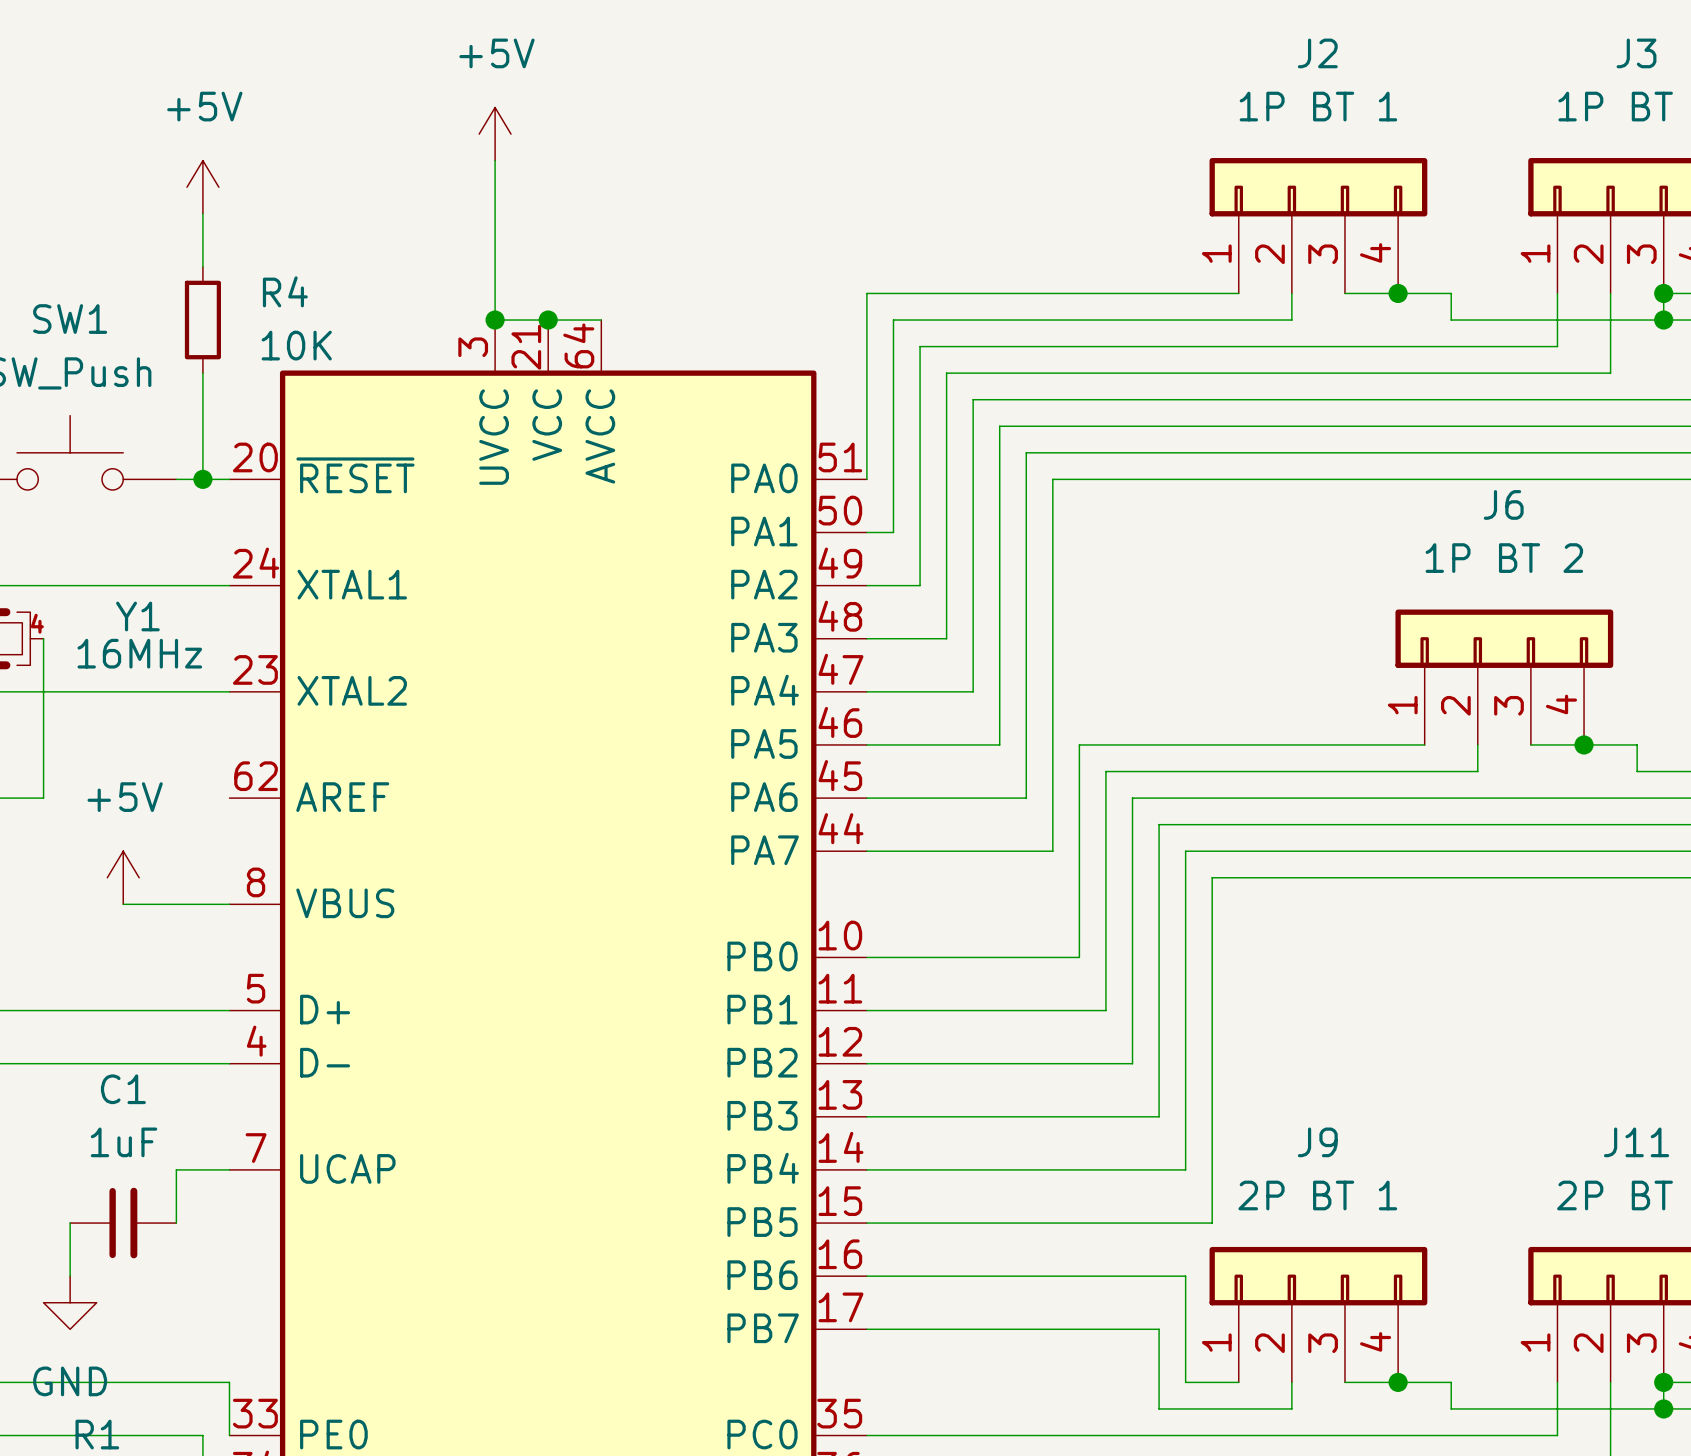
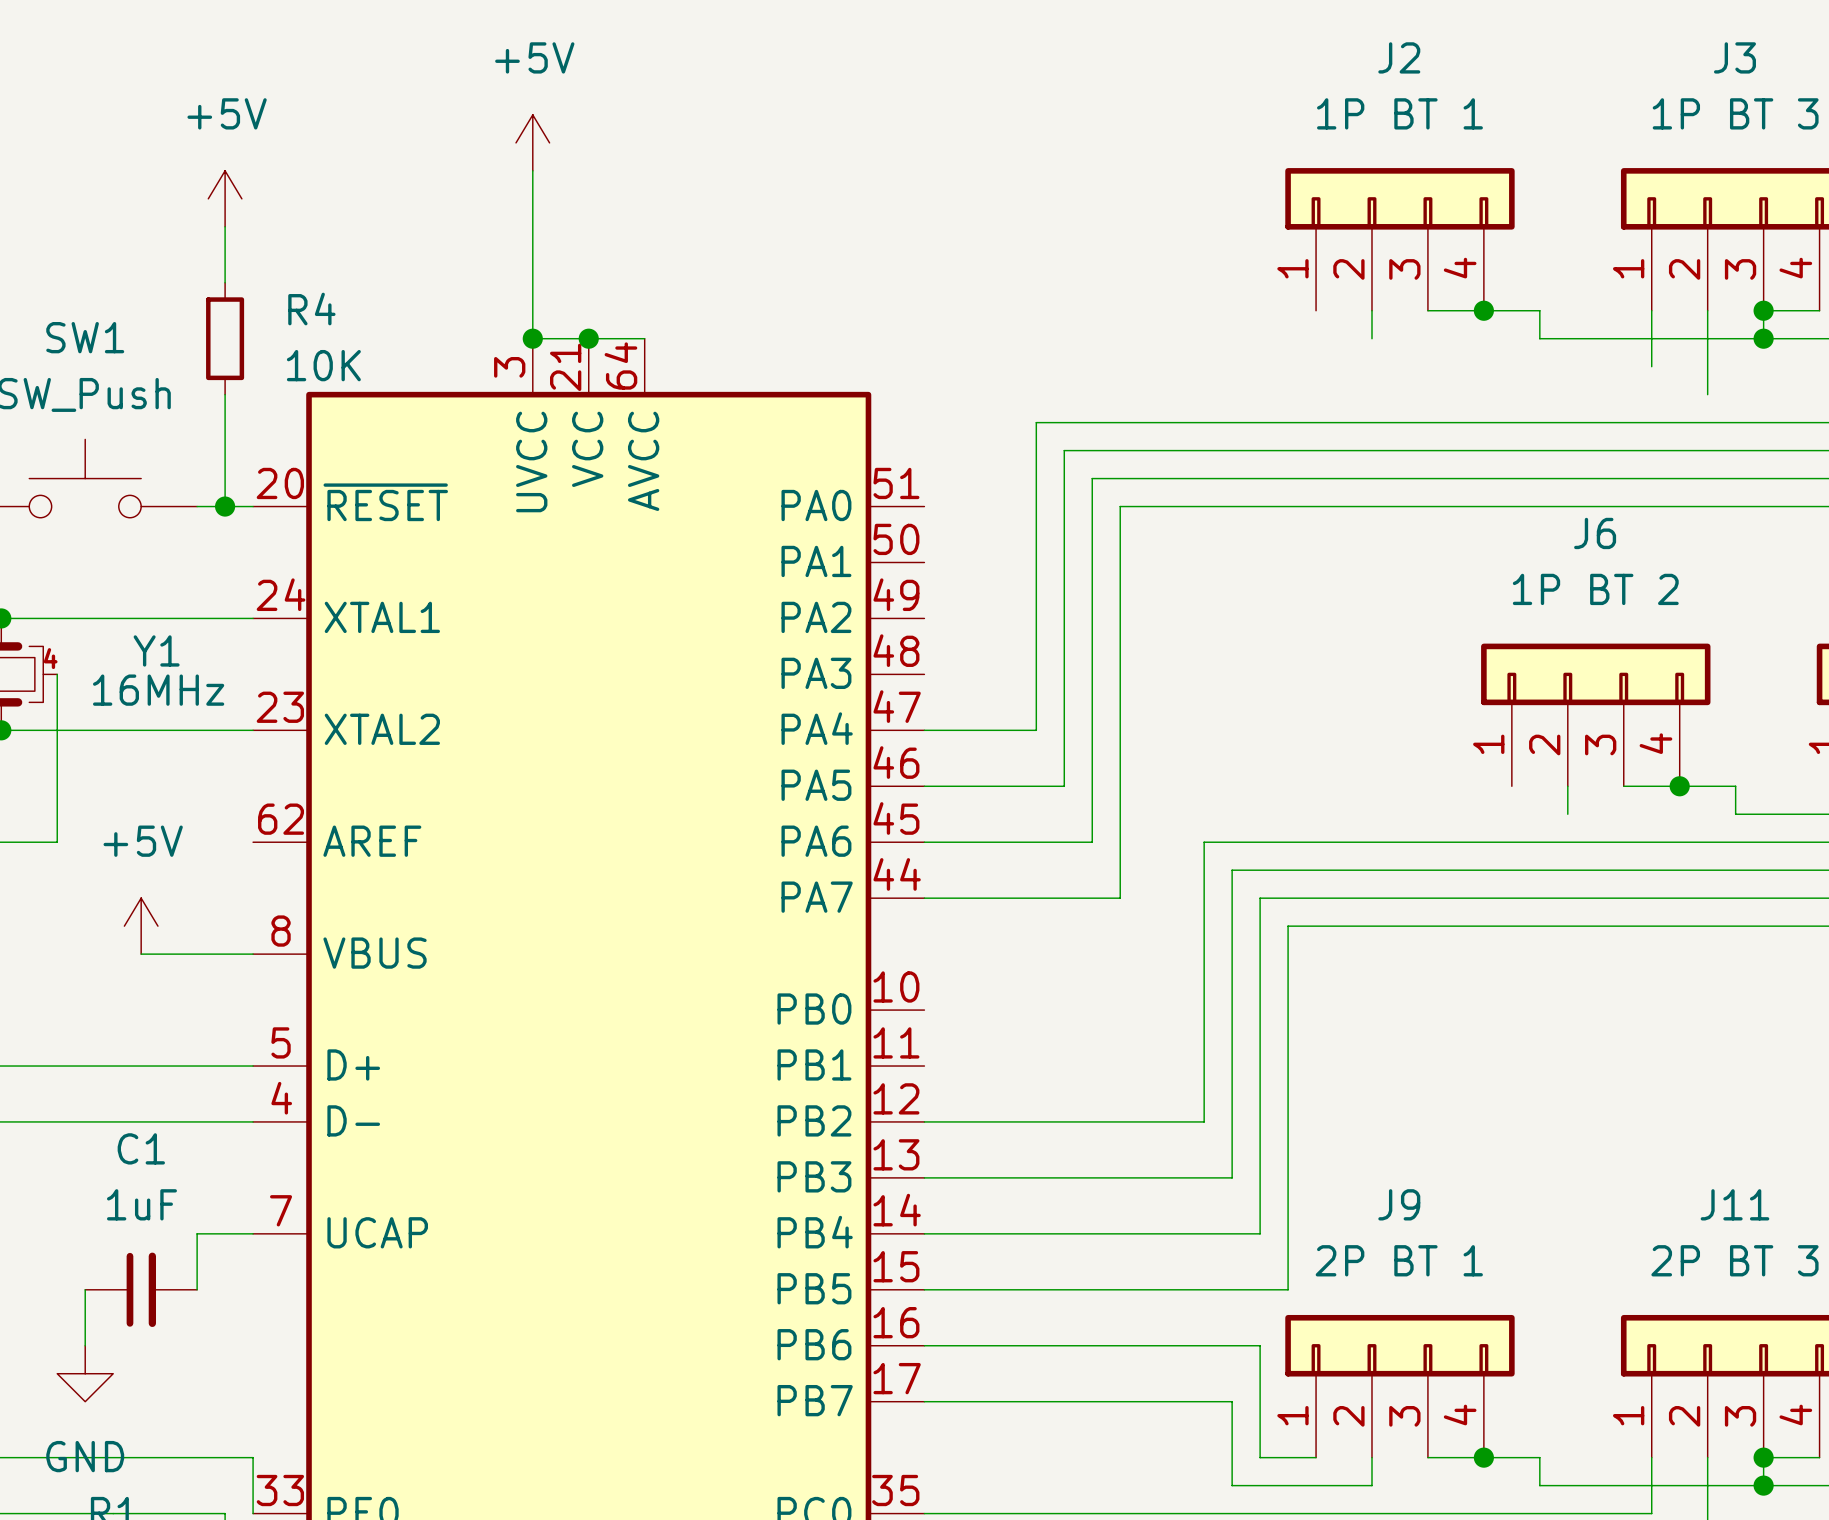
wire: (1238, 293) (866, 293) (866, 479) -> none
wire: (1291, 320) (893, 320) (893, 532) (866, 532) -> none
wire: (1557, 346) (920, 346) (920, 585) (866, 585) -> none
wire: (1610, 373) (946, 373) (946, 638) (866, 638) -> none
wire: (1424, 744) (1079, 744) (1079, 957) (866, 957) -> none
wire: (1477, 771) (1105, 771) (1105, 1010) (866, 1010) -> none

